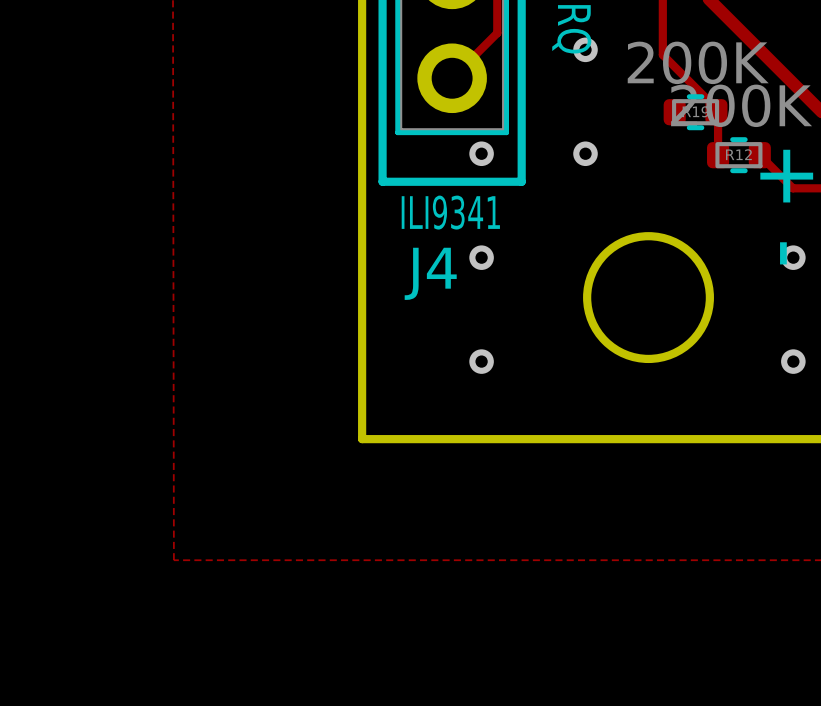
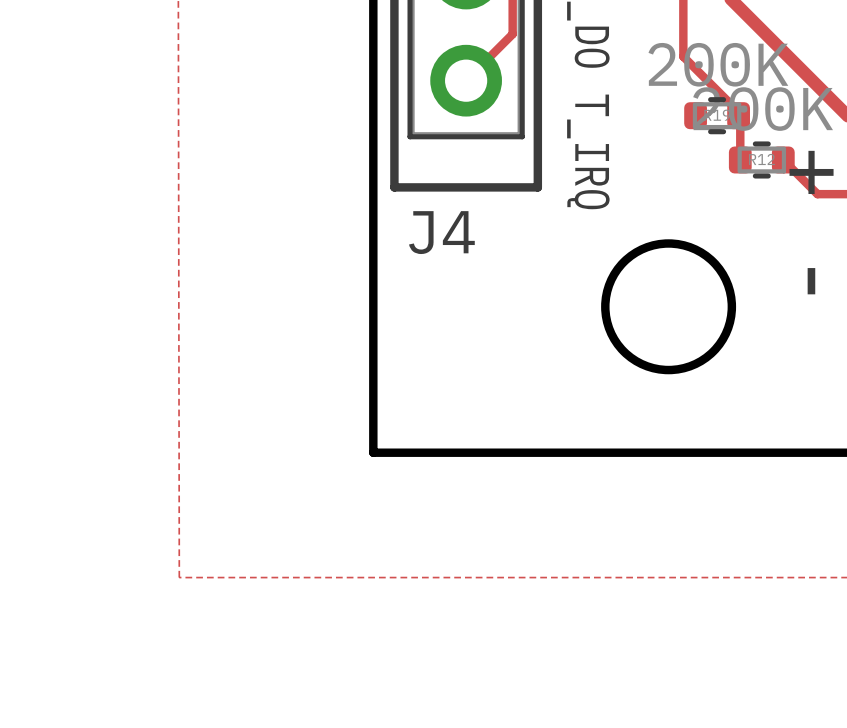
via: (585, 49) -> none
via: (481, 153) -> none
via: (585, 153) -> none
text: ILI9341 (450, 212) -> none
via: (481, 257) -> none
via: (793, 257) -> none
J4 name position: J4 (430, 273) -> J4 (441, 232)
via: (481, 361) -> none
via: (793, 361) -> none

